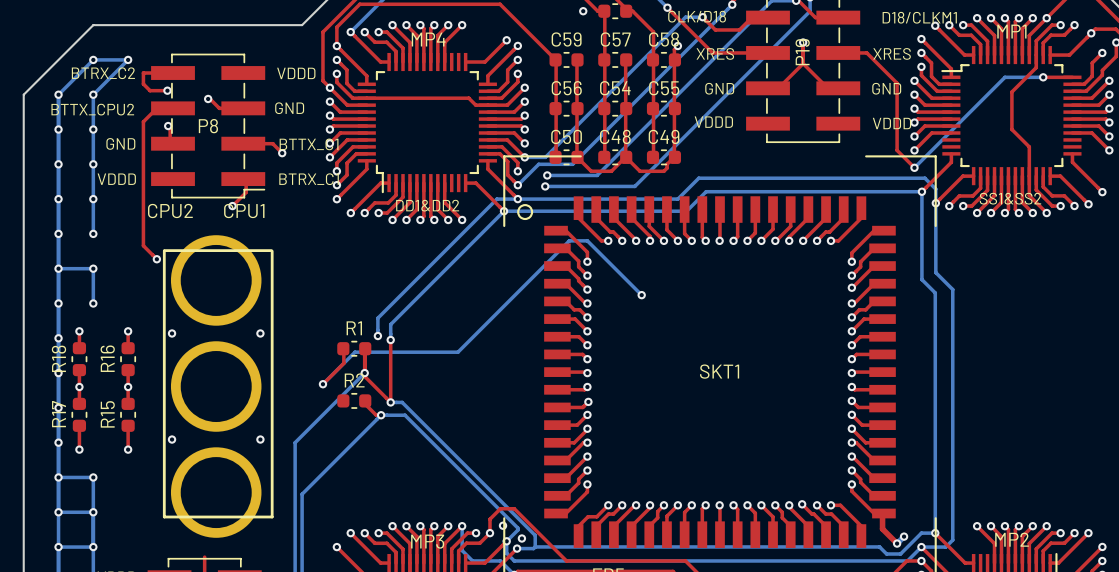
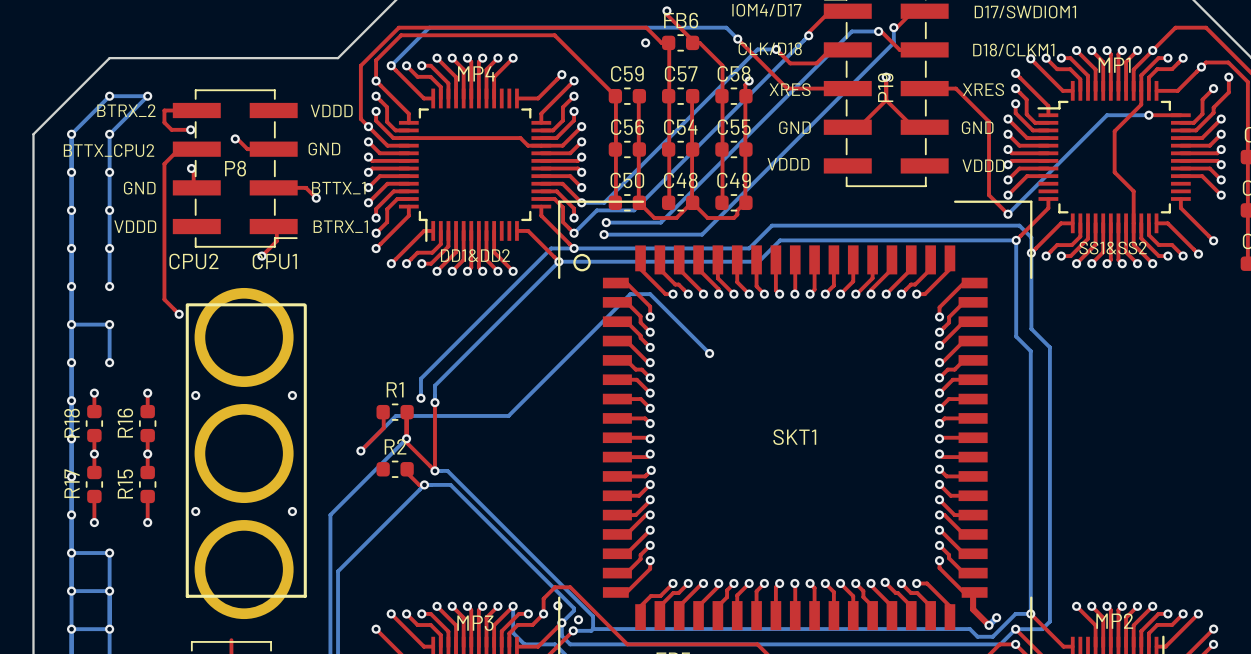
text: BTRX_C2 (103, 73) -> BTRX_2 (126, 110)
text: BTTX_C1 (309, 144) -> BTTX_1 (338, 188)
text: BTRX_C1 (309, 179) -> BTRX_1 (340, 226)

